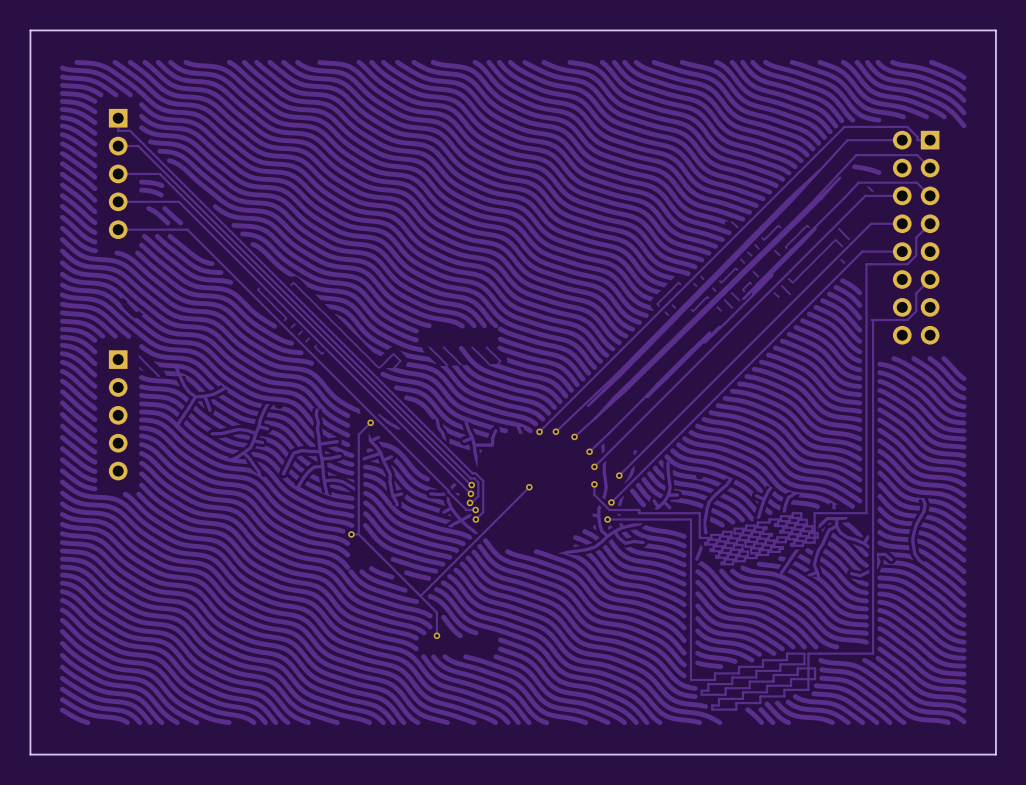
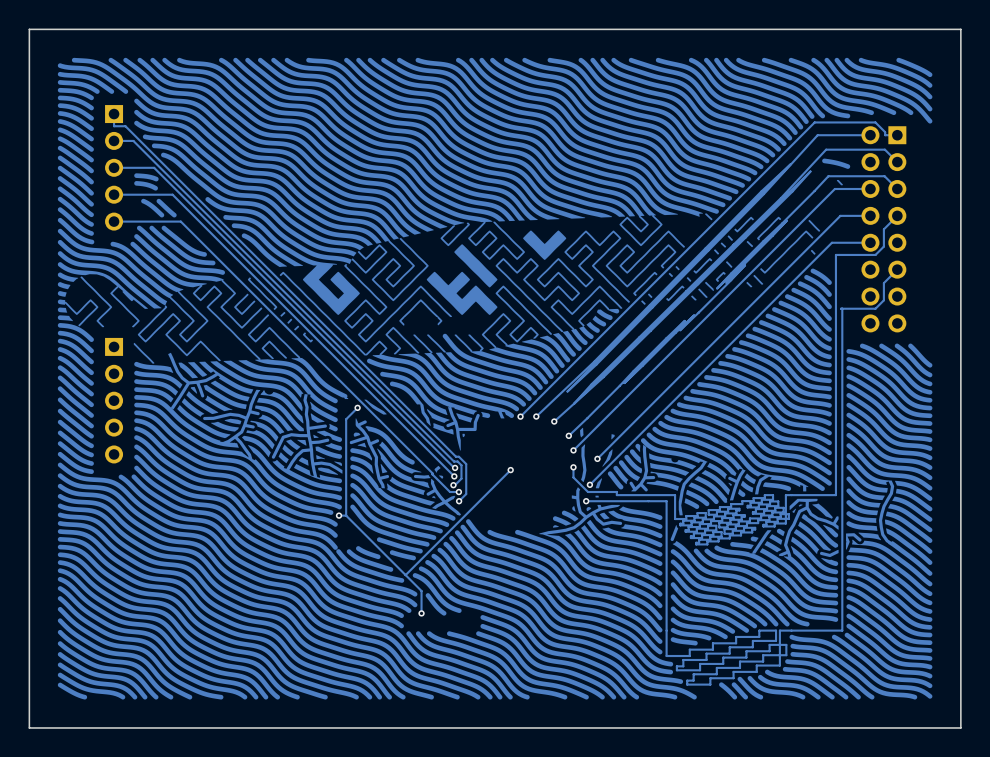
drawing: [59, 59, 732, 428] -> none
drawing: none -> [57, 57, 685, 413]
drawing shape: [356, 59, 712, 256] -> [356, 57, 663, 247]
drawing shape: [59, 282, 315, 413] -> [137, 305, 221, 362]
drawing shape: [498, 336, 586, 382] -> [481, 313, 560, 379]
drawing shape: [400, 350, 437, 365] -> [385, 326, 420, 355]
drawing shape: [405, 361, 538, 427] -> [398, 353, 520, 412]

